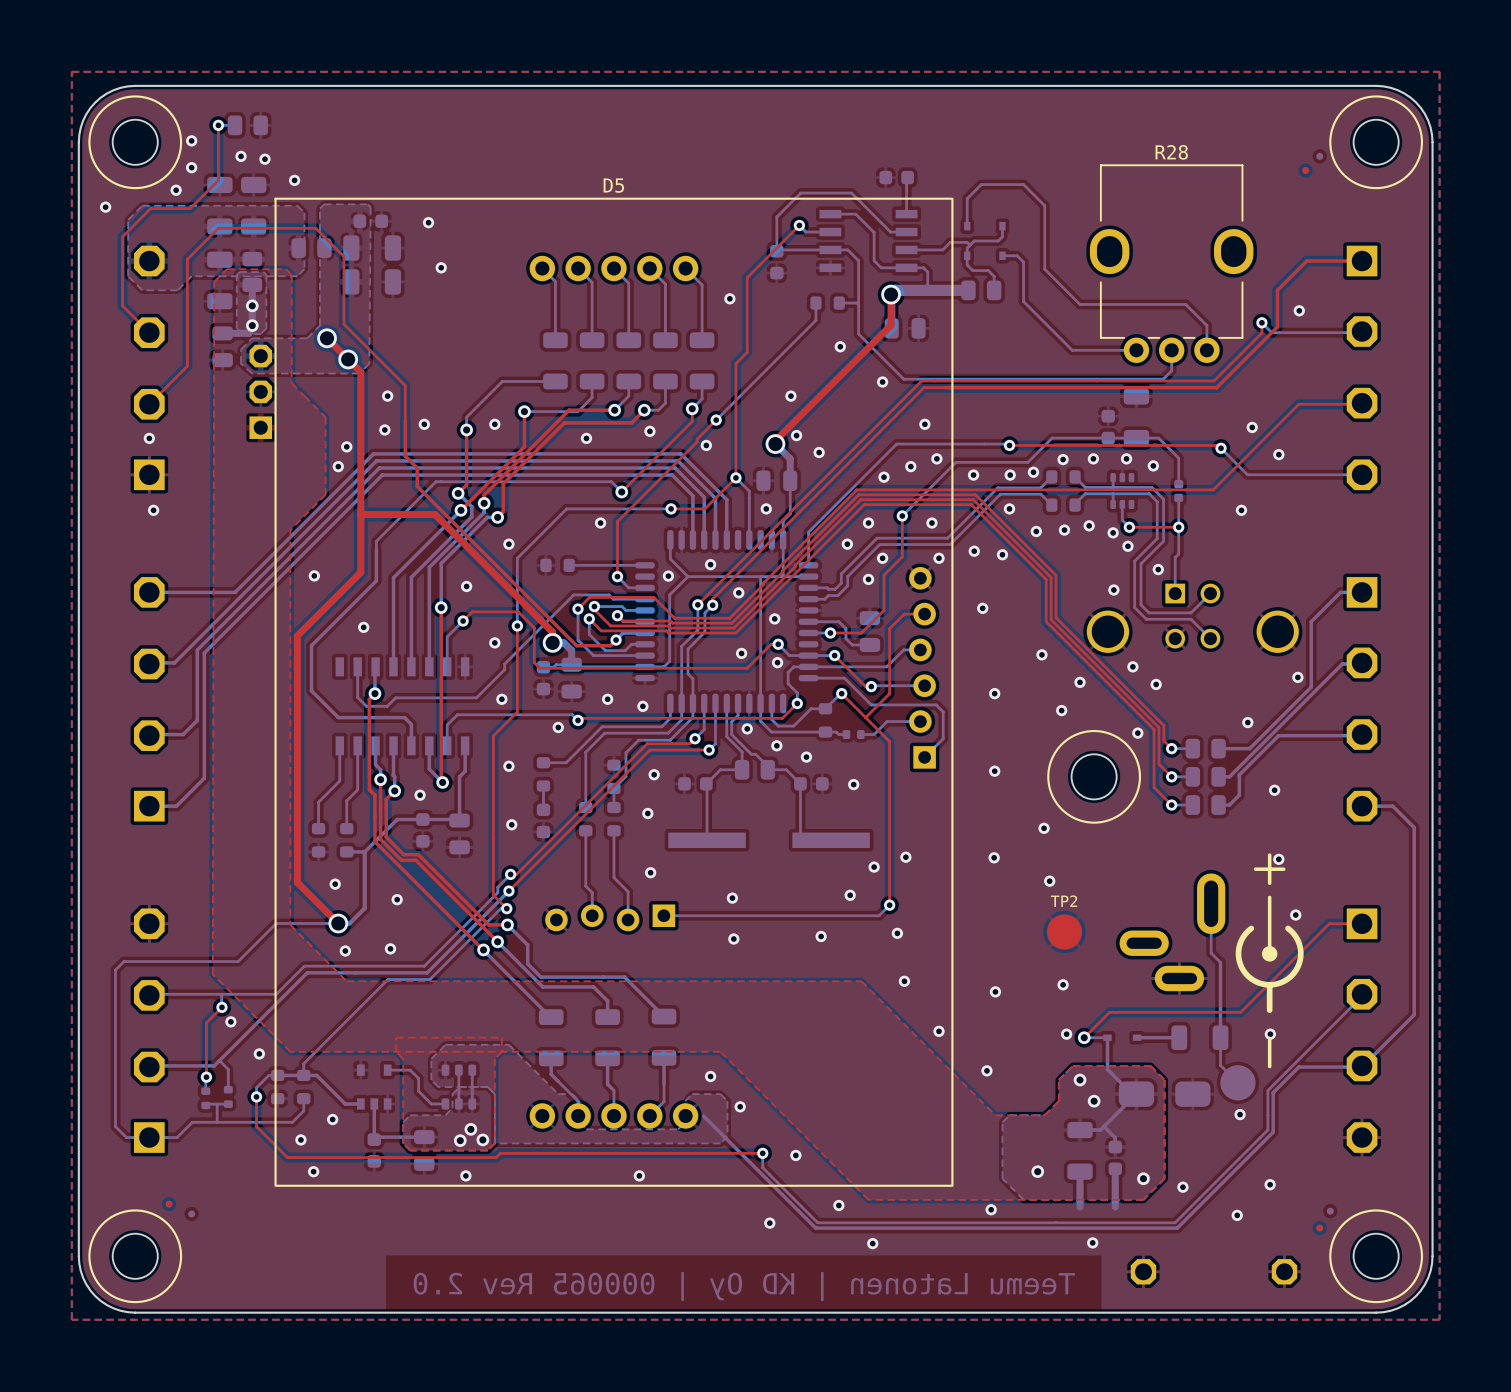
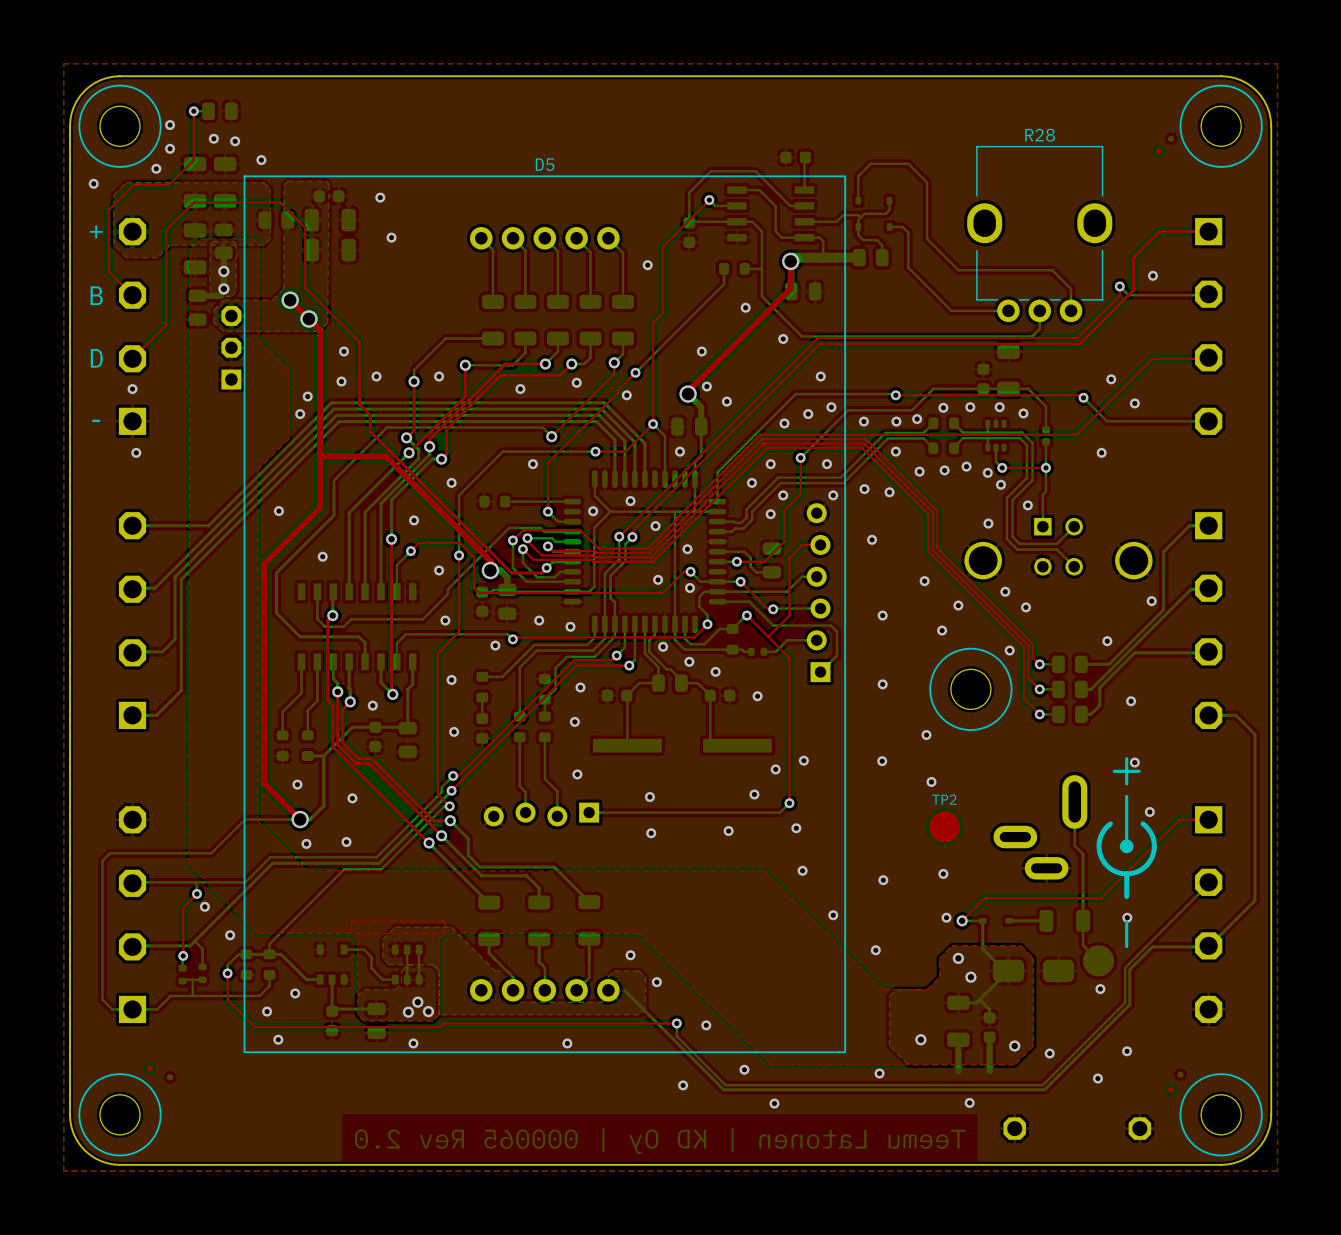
text: none -> + (96, 231)
text: none -> B (96, 295)
text: none -> D (96, 358)
text: none -> - (96, 420)

